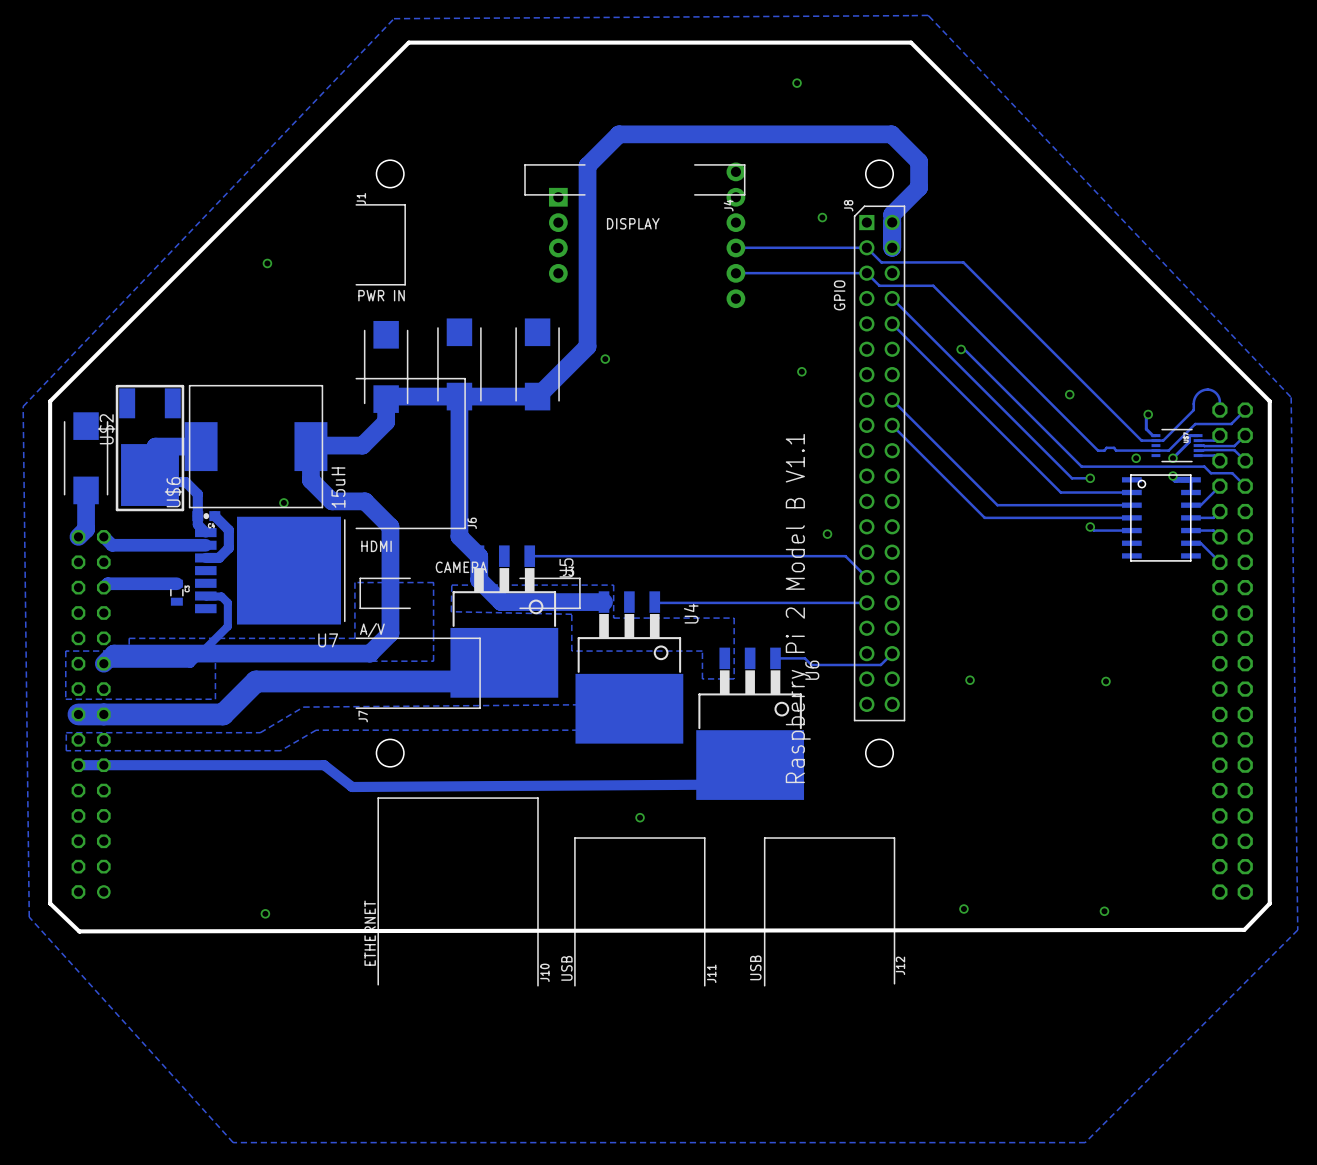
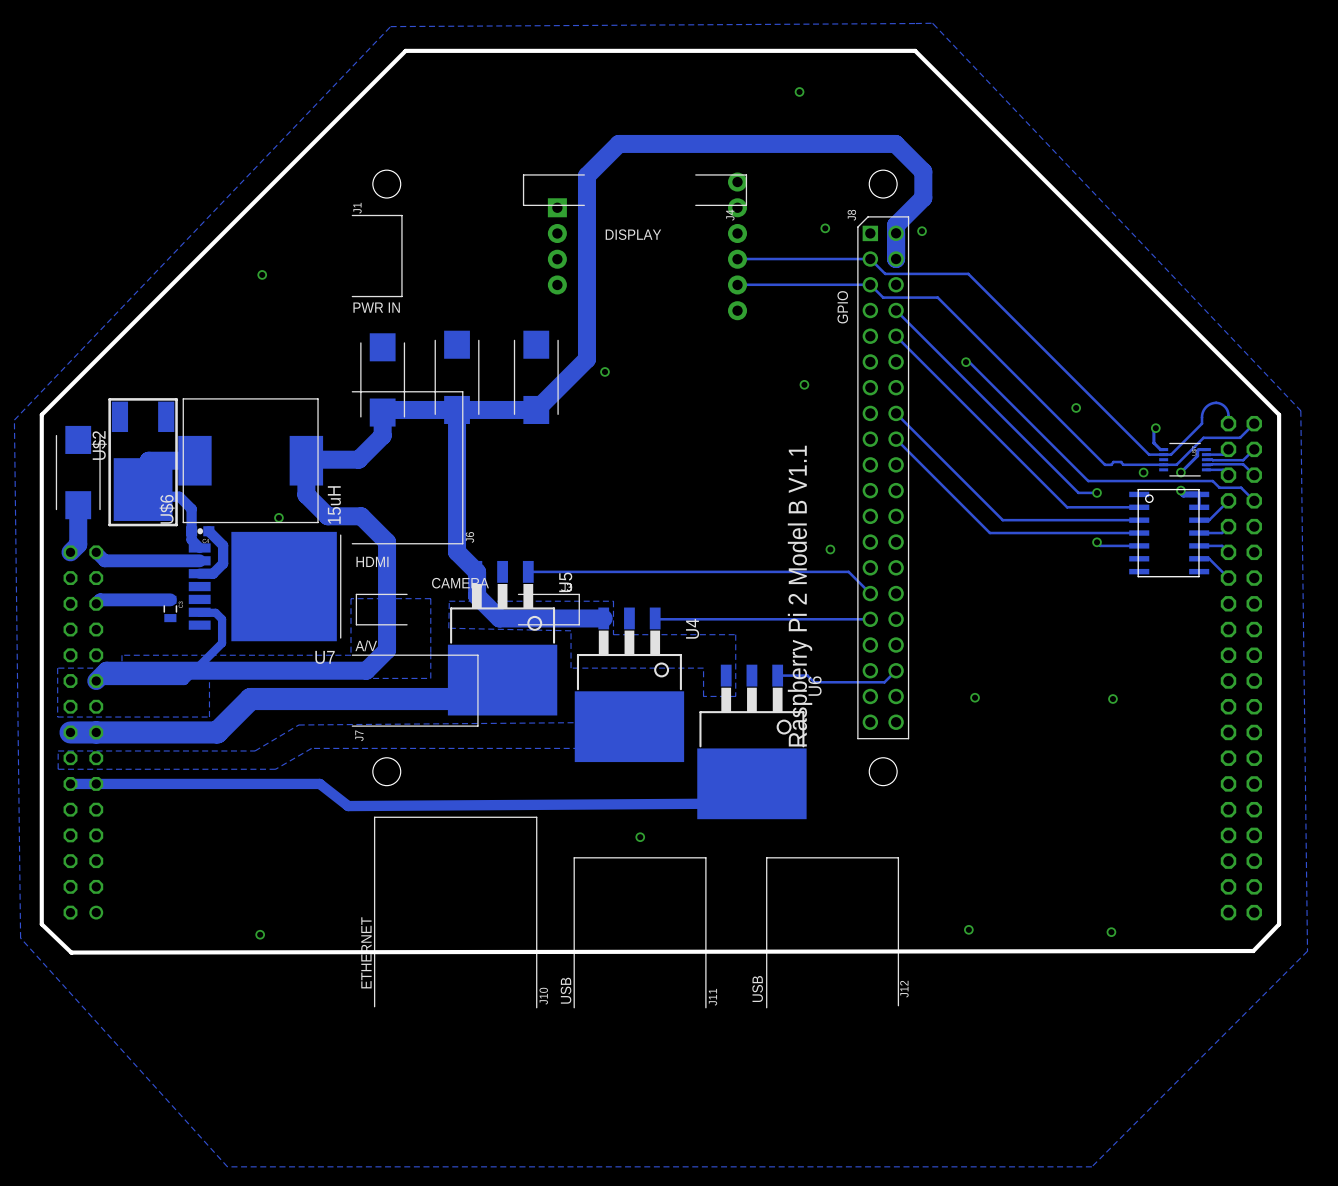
via: none -> (922, 231)

